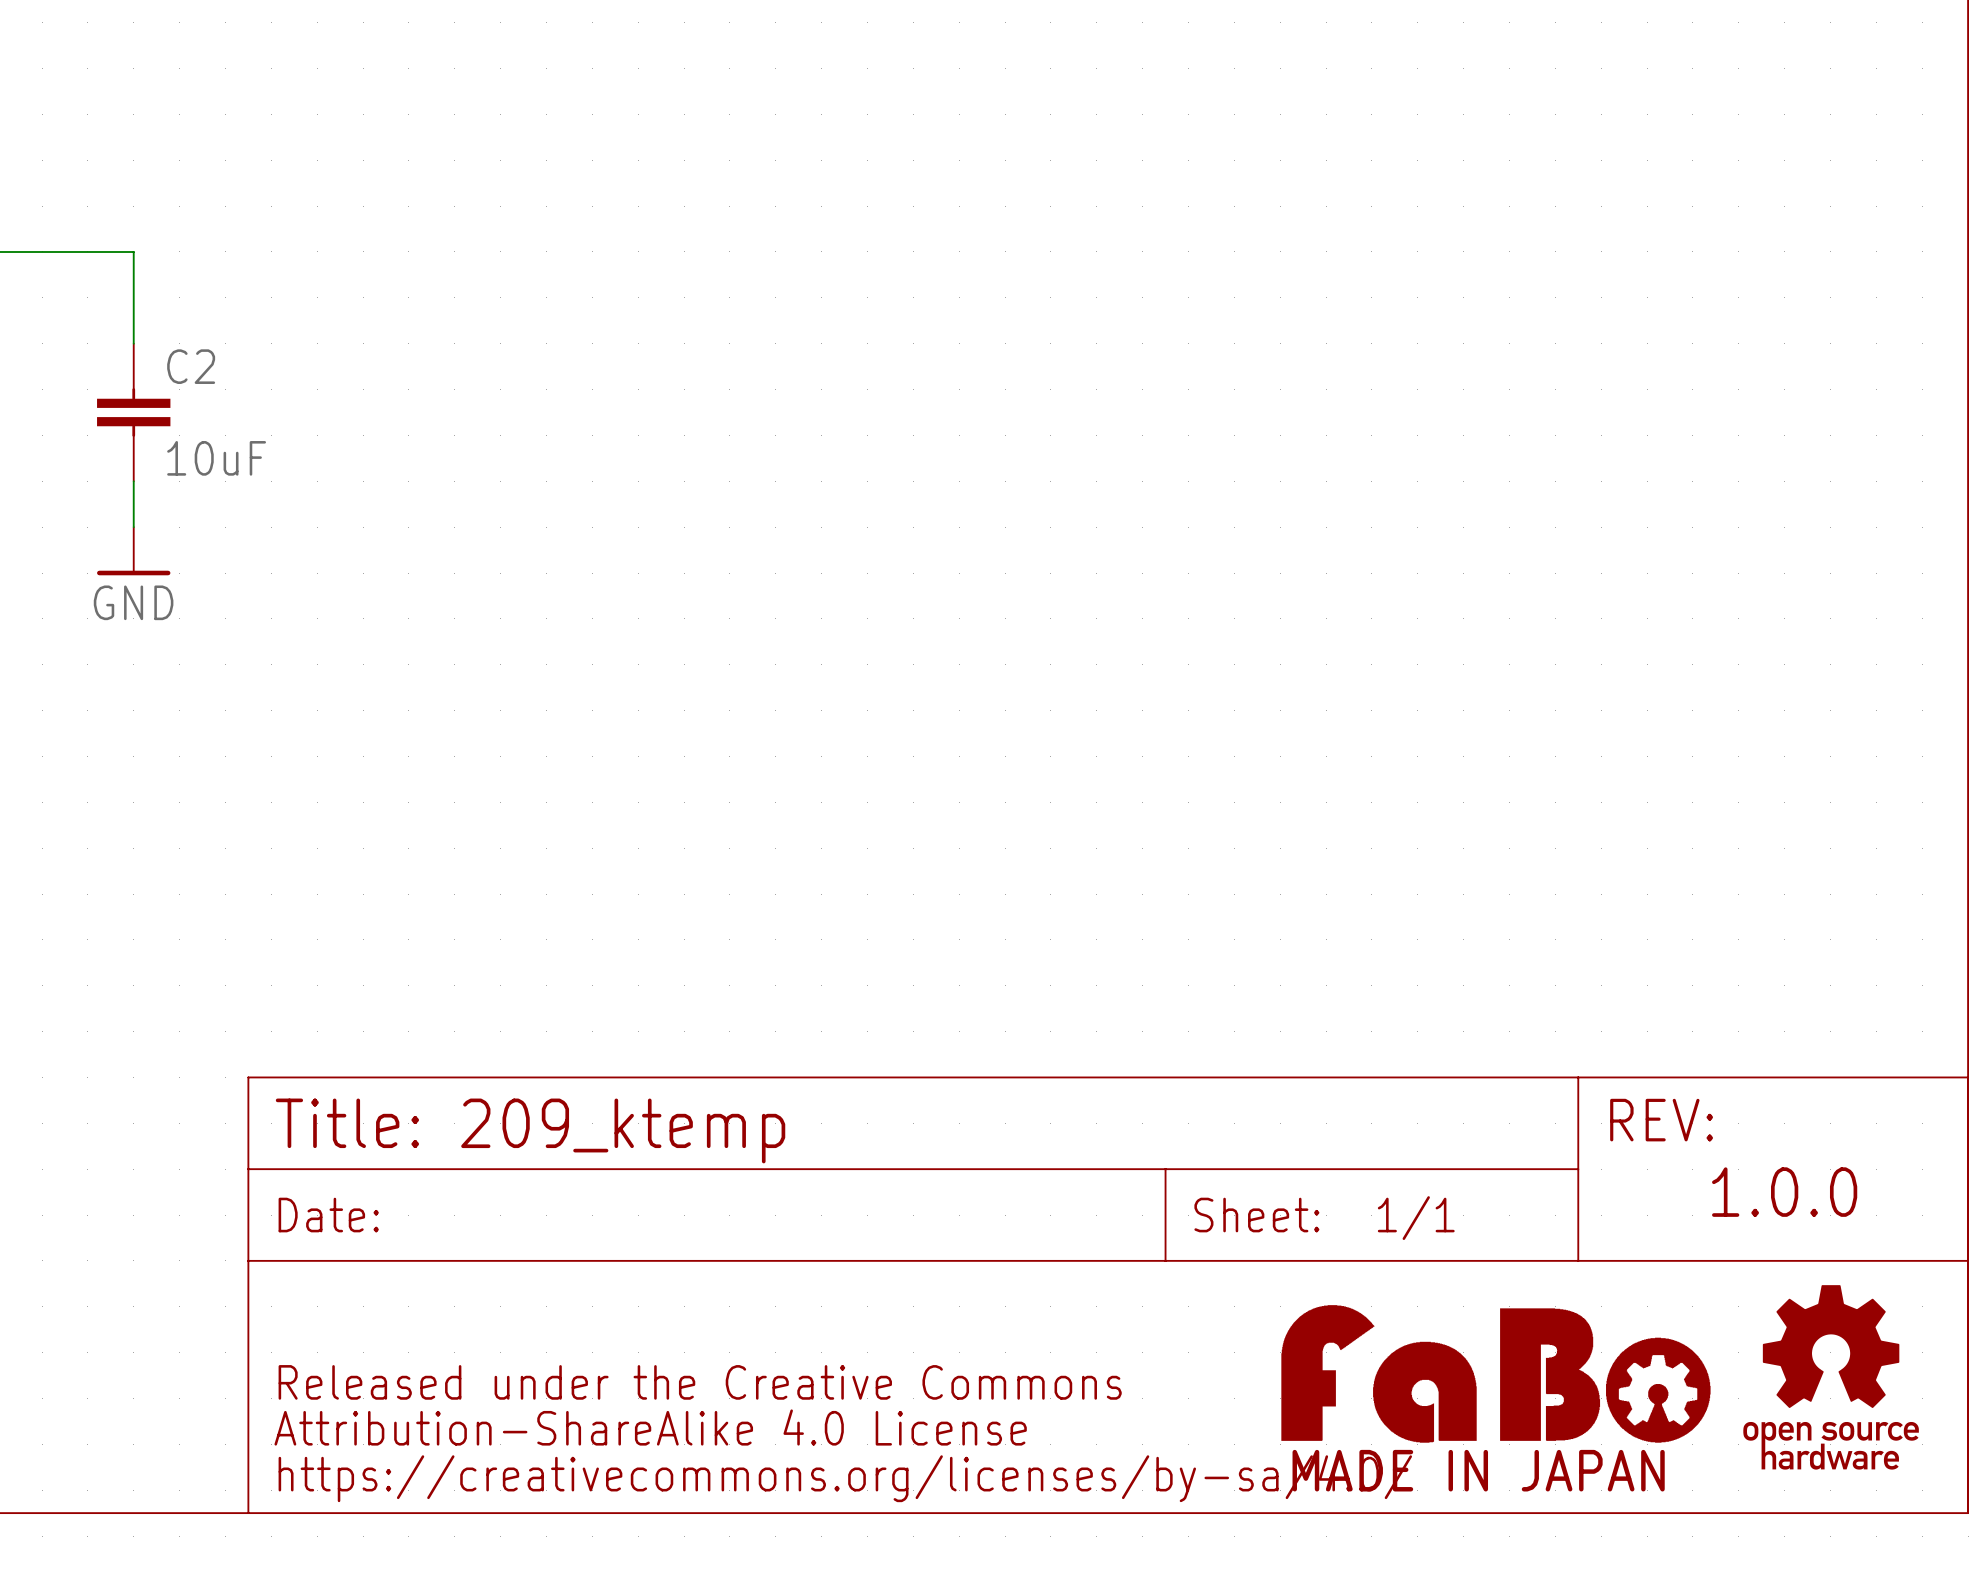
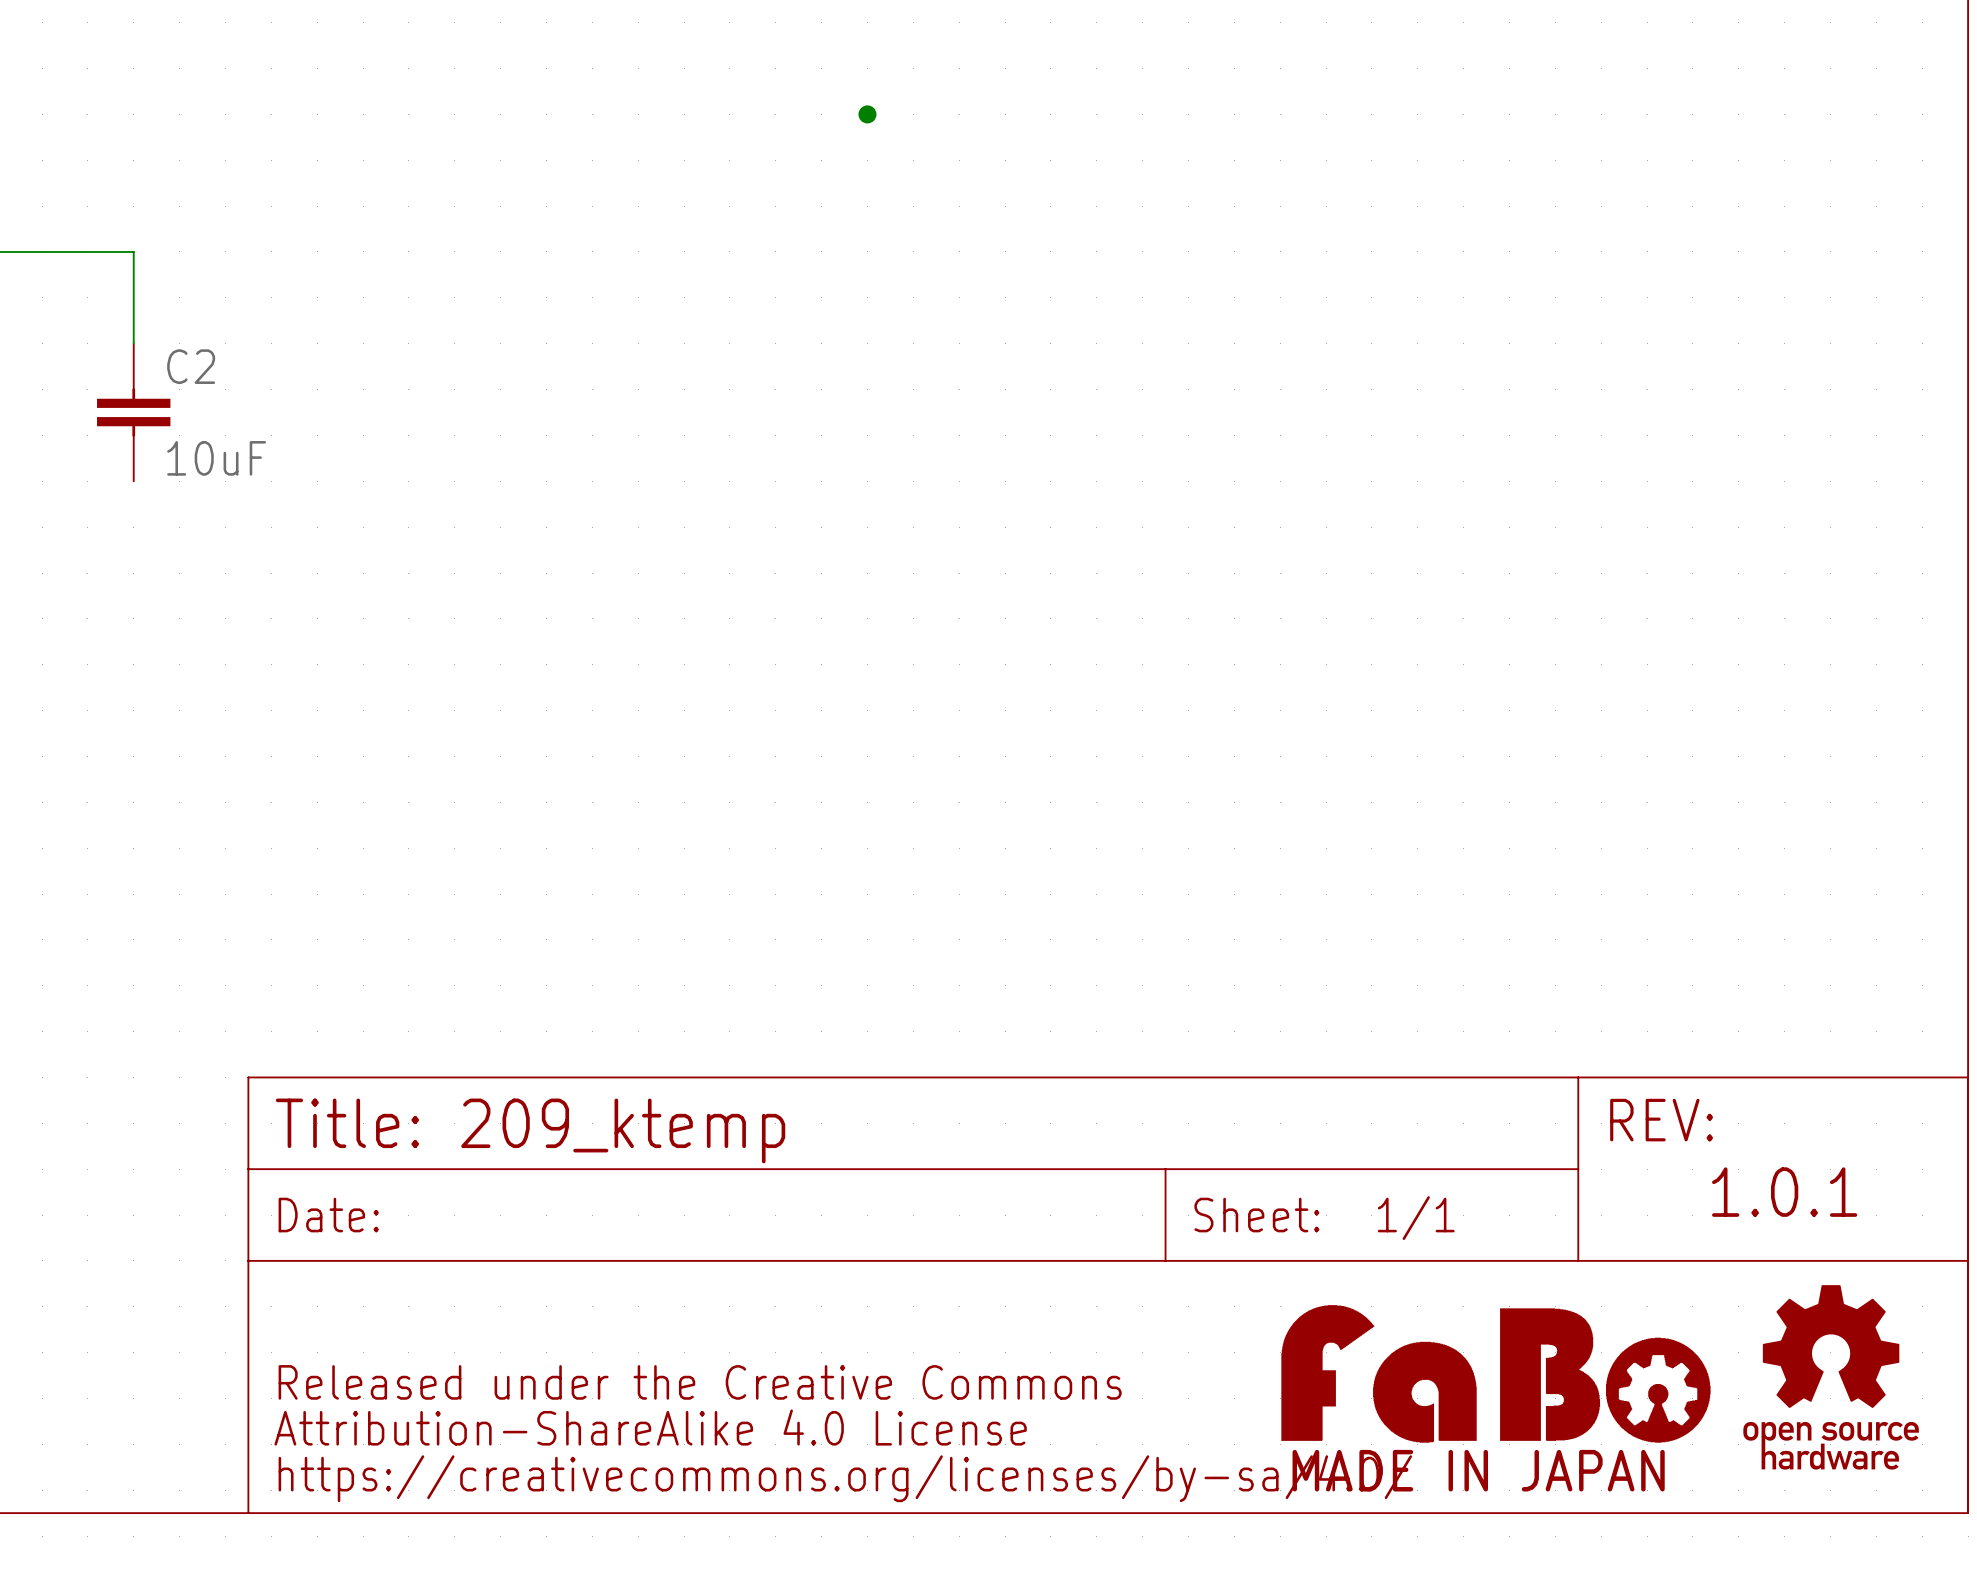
junction: none -> (867, 114)
wire: (133, 481) (133, 527) -> none
power symbol: GND (133, 551) -> none
text: 1.0.0 (1784, 1192) -> 1.0.1 (1784, 1192)

